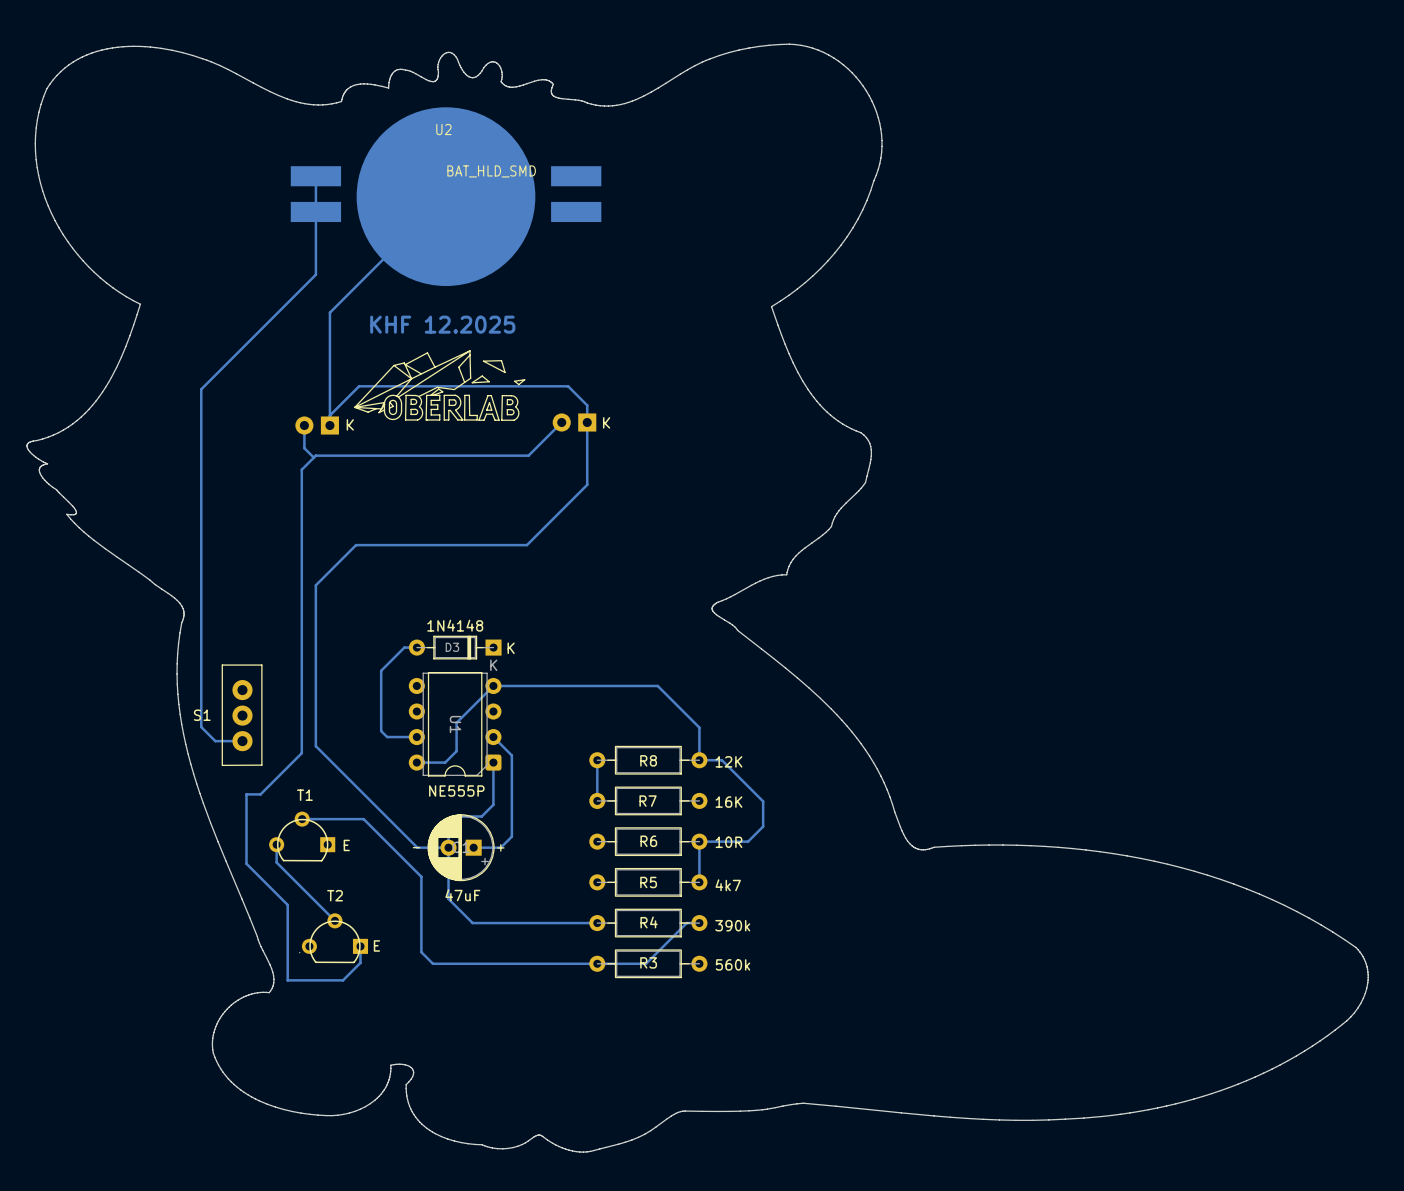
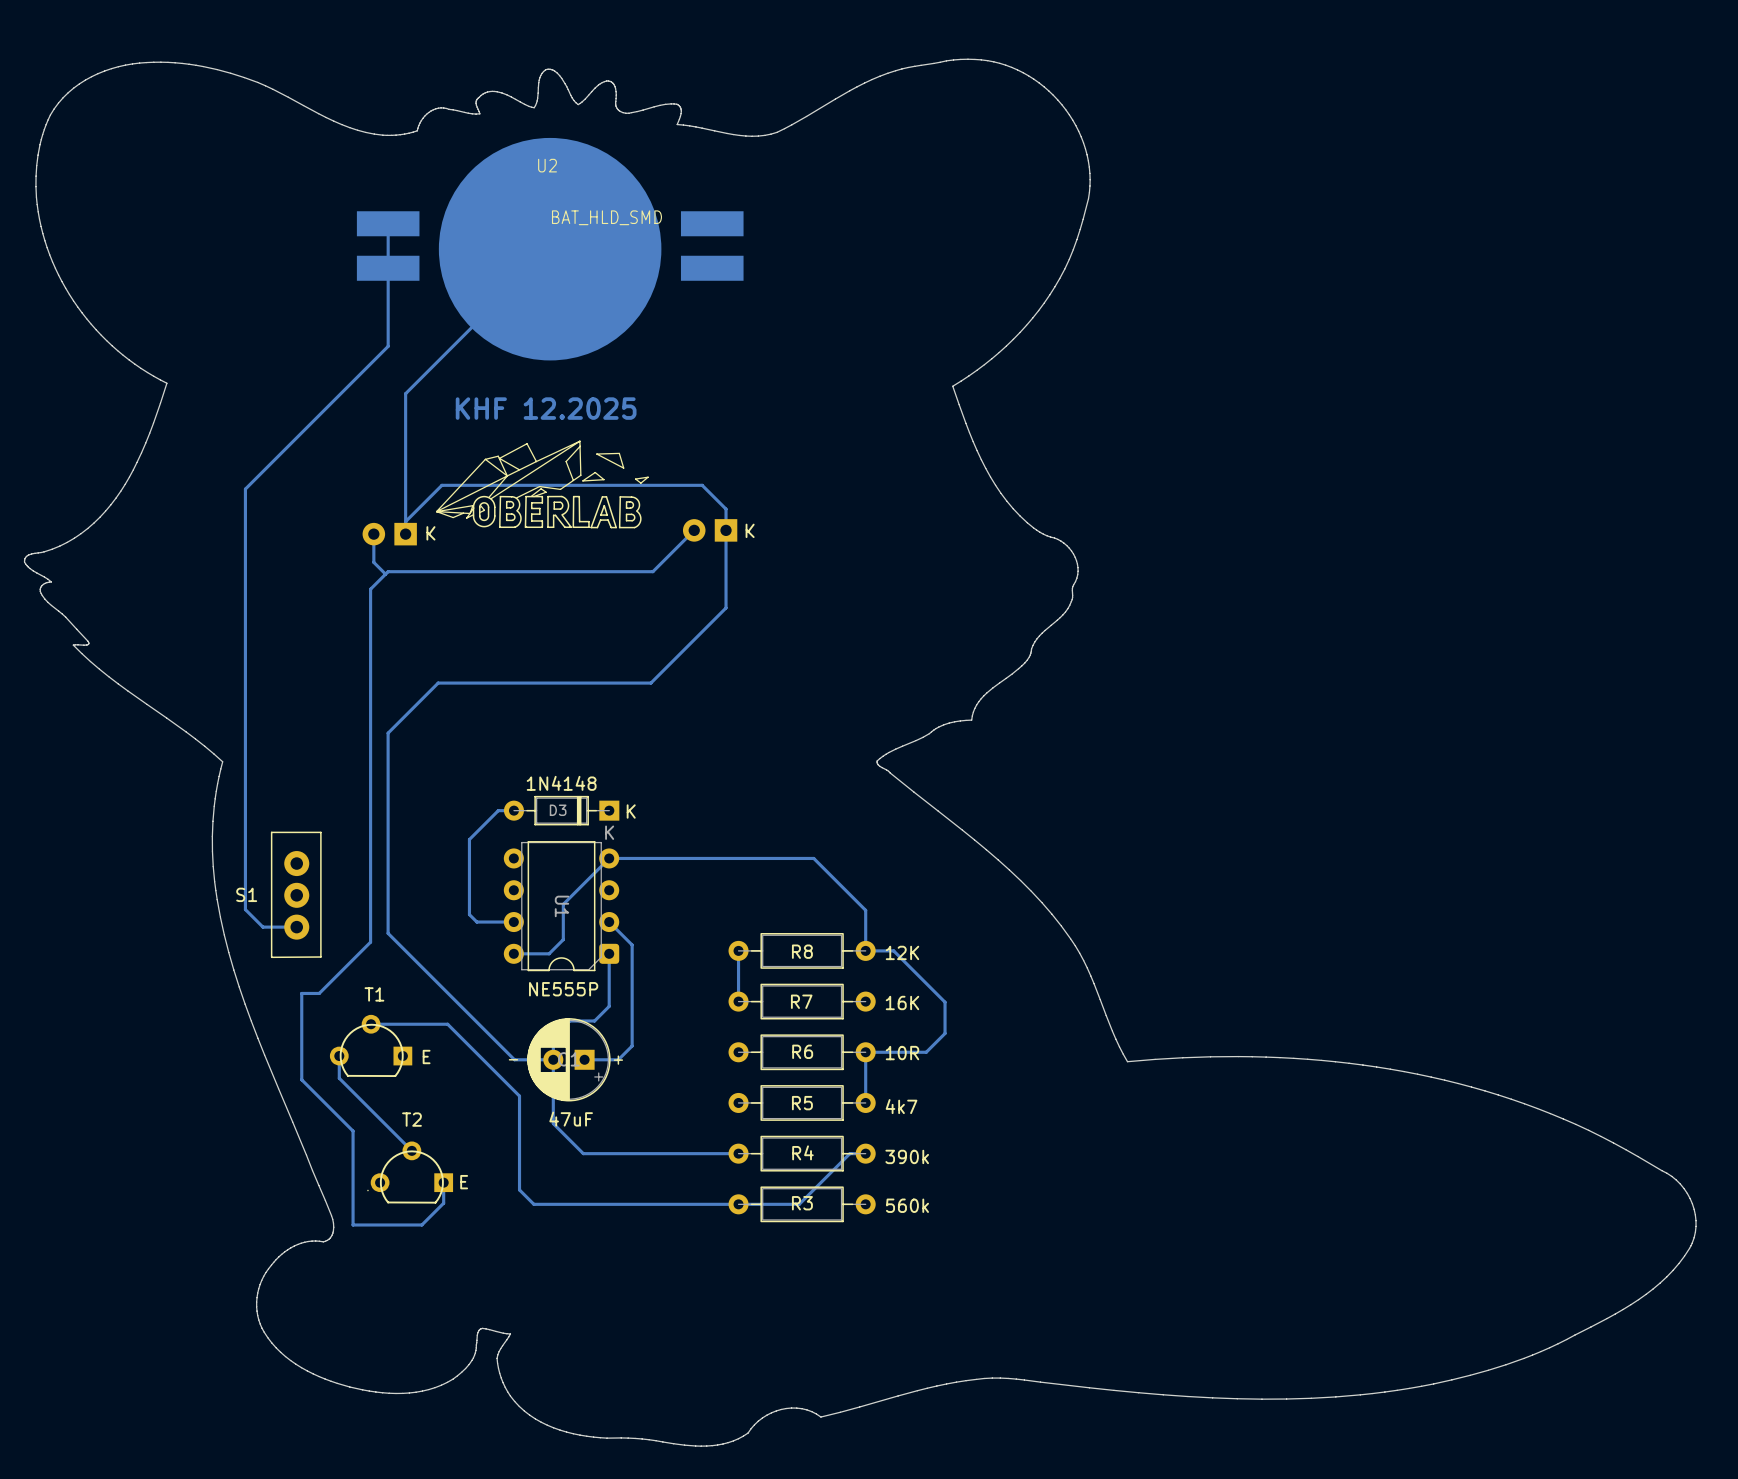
board edge: (789, 44) (818, 50) (833, 57) (847, 68) (869, 96) (879, 123) (882, 146) (879, 163) (866, 200) (852, 228) (820, 268) (797, 289) (771, 306) (788, 353) (807, 389) (830, 415) (866, 437) (870, 446) (870, 459) (863, 485) (838, 510) (828, 529) (795, 556) (789, 566) (786, 574) (772, 576) (755, 583) (716, 603) (712, 606) (713, 611) (797, 677) (846, 725) (877, 769) (903, 834) (913, 846) (923, 849) (947, 846) (1016, 845) (1085, 849) (1154, 861) (1220, 879) (1259, 894) (1296, 911) (1355, 947) (1364, 959) (1367, 972) (1366, 988) (1360, 1003) (1346, 1020) (1320, 1041) (1288, 1060) (1246, 1080) (1211, 1093) (1166, 1105) (1130, 1112) (1083, 1118) (1032, 1120) (983, 1119) (803, 1103) (756, 1110) (682, 1111) (673, 1114) (638, 1137) (583, 1152) (562, 1147) (539, 1135) (517, 1146) (502, 1148) (461, 1142) (435, 1133) (419, 1122) (410, 1108) (406, 1084) (413, 1072) (411, 1067) (402, 1064) (390, 1065) (388, 1082) (377, 1098) (365, 1106) (349, 1113) (331, 1115) (301, 1113) (275, 1107) (255, 1098) (237, 1087) (223, 1072) (213, 1052) (212, 1038) (216, 1024) (226, 1009) (246, 995) (257, 992) (269, 992) (273, 984) (273, 975) (210, 822) (188, 754) (180, 714) (177, 684) (177, 653) (184, 615) (183, 608) (174, 598) (94, 540) (74, 523) (66, 514) (75, 514) (74, 508) (40, 474) (40, 466) (47, 463) (33, 455) (26, 446) (30, 441) (48, 437) (68, 427) (81, 417) (96, 401) (108, 382) (121, 357) (140, 304) (113, 287) (88, 266) (63, 234) (48, 206) (38, 175) (35, 143) (38, 112) (46, 88) (64, 68) (86, 54) (112, 47) (144, 46) (172, 50) (206, 60) (291, 100) (309, 104) (327, 104) (341, 101) (347, 89) (357, 84) (371, 84) (388, 88) (391, 75) (398, 69) (410, 71) (428, 80) (434, 81) (437, 77) (439, 60) (443, 54) (448, 52) (454, 54) (463, 72) (470, 77) (476, 76) (486, 65) (493, 61) (500, 67) (501, 81) (506, 86) (516, 86) (538, 80) (546, 80) (553, 84) (551, 93) (556, 97) (608, 106) (636, 99) (695, 65) (719, 55) (749, 48) (789, 44) -> (967, 59) (987, 60) (1005, 65) (1023, 72) (1043, 86) (1057, 99) (1072, 120) (1087, 154) (1090, 179) (1088, 198) (1076, 239) (1059, 278) (1038, 310) (1013, 339) (984, 364) (952, 386) (973, 441) (995, 485) (1013, 508) (1027, 522) (1043, 534) (1061, 541) (1069, 548) (1076, 560) (1077, 574) (1072, 586) (1072, 599) (1065, 611) (1036, 638) (1024, 663) (981, 698) (974, 708) (971, 720) (954, 721) (938, 727) (923, 737) (885, 754) (877, 760) (877, 764) (997, 859) (1051, 914) (1070, 938) (1083, 960) (1115, 1039) (1127, 1061) (1238, 1056) (1335, 1061) (1431, 1077) (1511, 1099) (1588, 1130) (1637, 1156) (1676, 1180) (1687, 1193) (1694, 1209) (1696, 1226) (1690, 1245) (1673, 1270) (1646, 1294) (1615, 1314) (1549, 1347) (1506, 1364) (1470, 1375) (1421, 1386) (1360, 1394) (1286, 1399) (1212, 1397) (1114, 1390) (1016, 1379) (984, 1378) (927, 1388) (820, 1417) (801, 1408) (781, 1409) (762, 1418) (748, 1433) (738, 1438) (723, 1444) (701, 1446) (642, 1438) (586, 1436) (560, 1430) (541, 1422) (524, 1411) (514, 1401) (501, 1378) (497, 1358) (510, 1333) (486, 1328) (478, 1330) (474, 1355) (465, 1368) (447, 1382) (428, 1389) (402, 1393) (375, 1392) (349, 1387) (313, 1373) (290, 1360) (276, 1347) (262, 1328) (257, 1311) (257, 1297) (260, 1284) (273, 1262) (284, 1252) (297, 1244) (308, 1241) (327, 1240) (332, 1233) (333, 1223) (251, 1021) (224, 935) (215, 890) (212, 851) (214, 806) (222, 761) (185, 731) (108, 676) (73, 645) (88, 643) (65, 617) (42, 595) (40, 587) (45, 583) (51, 581) (29, 568) (24, 562) (28, 554) (52, 549) (74, 538) (93, 523) (110, 504) (125, 484) (141, 452) (166, 383) (129, 359) (96, 329) (69, 294) (52, 261) (41, 226) (35, 186) (39, 144) (50, 115) (68, 92) (98, 73) (132, 63) (175, 62) (203, 66) (244, 77) (273, 89) (349, 127) (374, 134) (396, 135) (417, 130) (424, 116) (435, 108) (443, 107) (479, 113) (476, 100) (483, 93) (489, 91) (502, 93) (534, 107) (537, 98) (539, 77) (543, 71) (548, 69) (559, 75) (572, 97) (578, 104) (598, 85) (608, 81) (615, 86) (616, 107) (622, 112) (628, 113) (665, 104) (676, 104) (681, 110) (677, 124) (733, 134) (758, 136) (777, 132) (857, 86) (887, 73) (914, 66) (967, 59)

